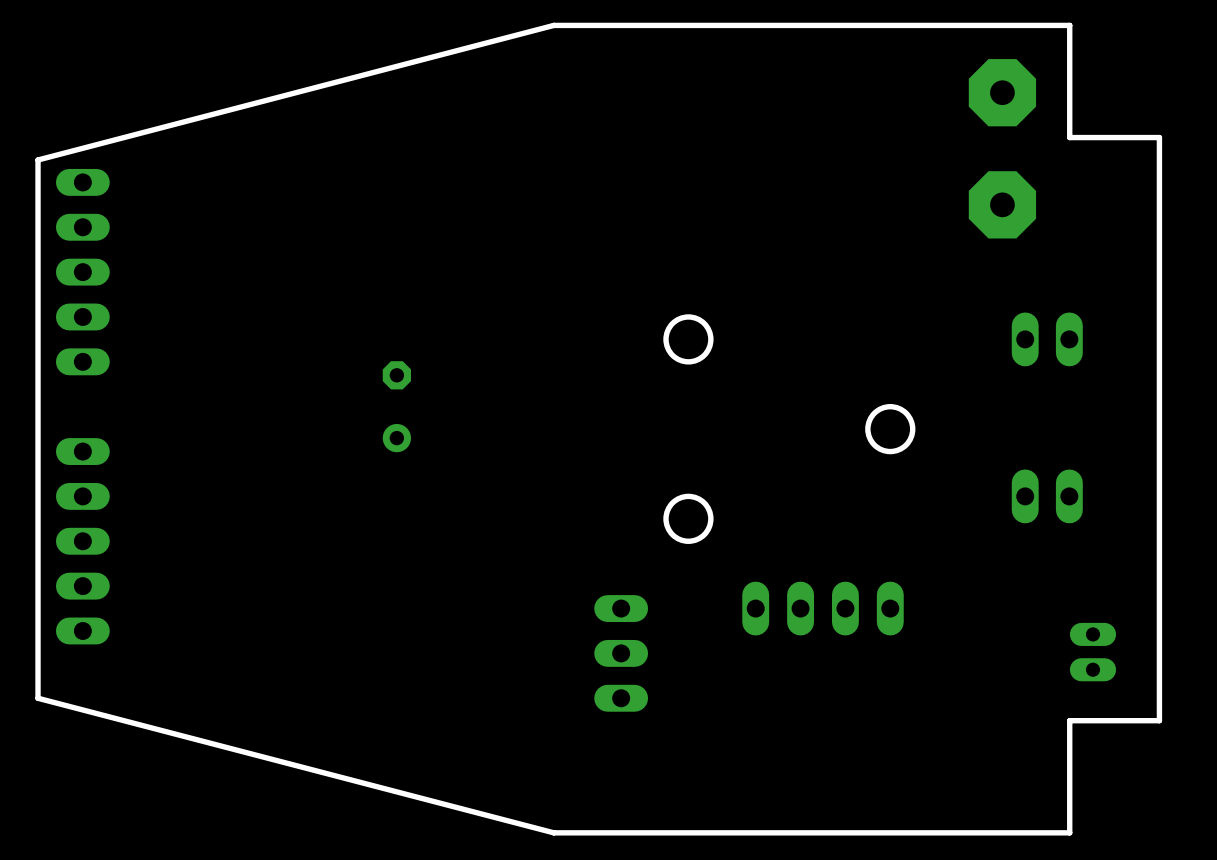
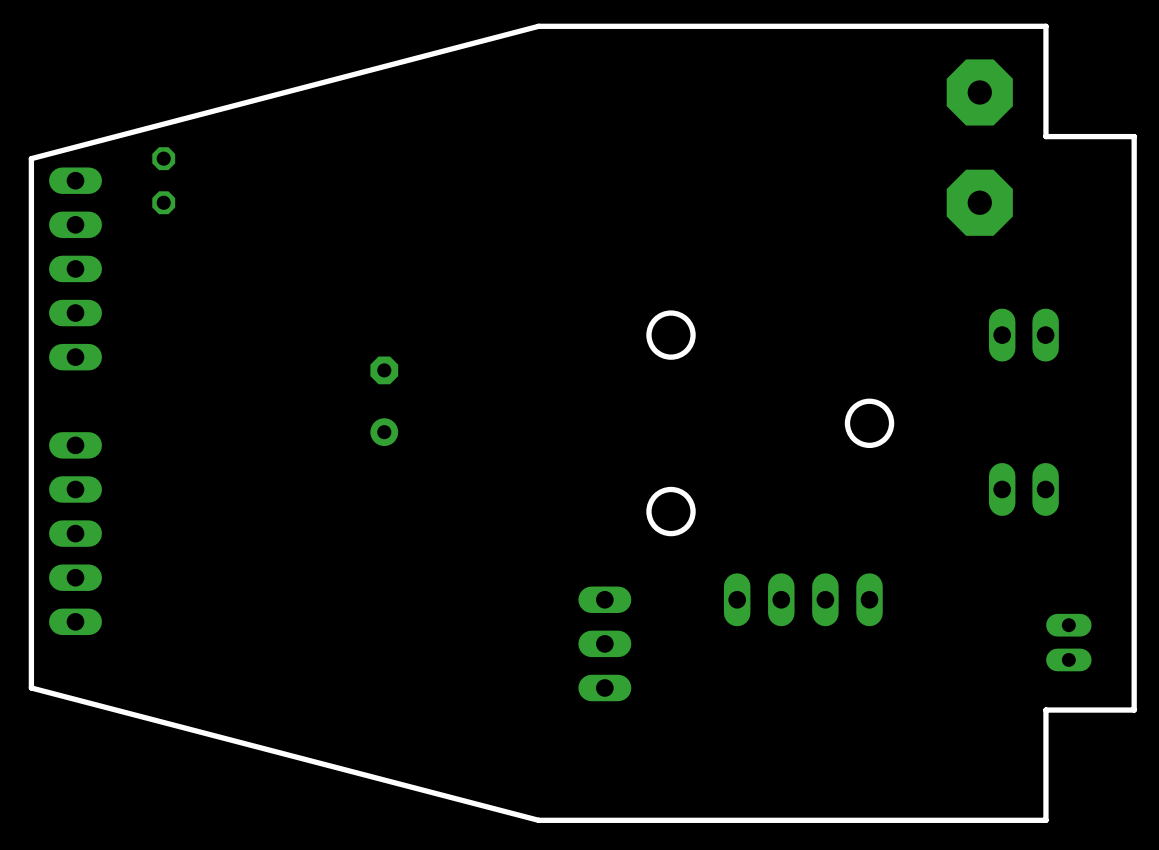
part: none -> (163, 180)

